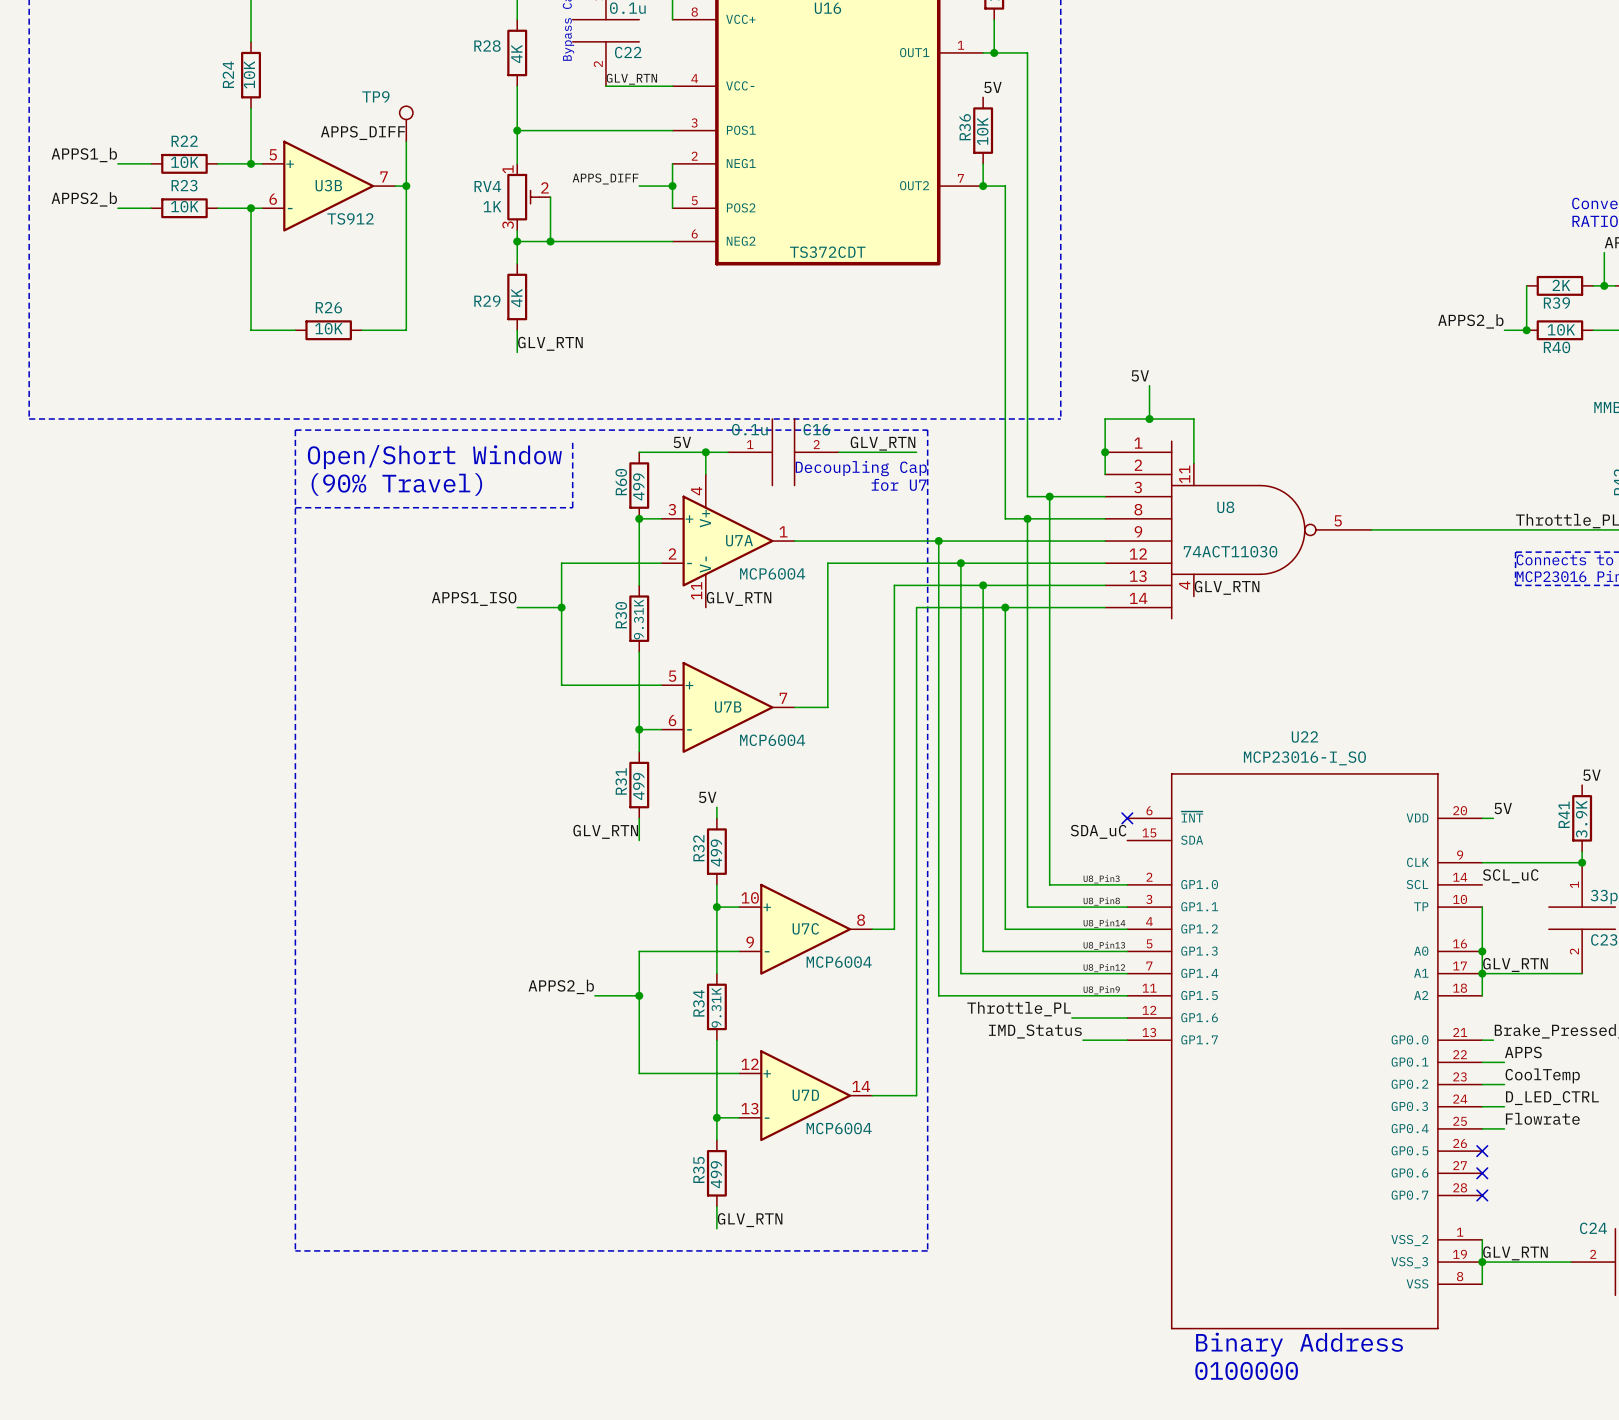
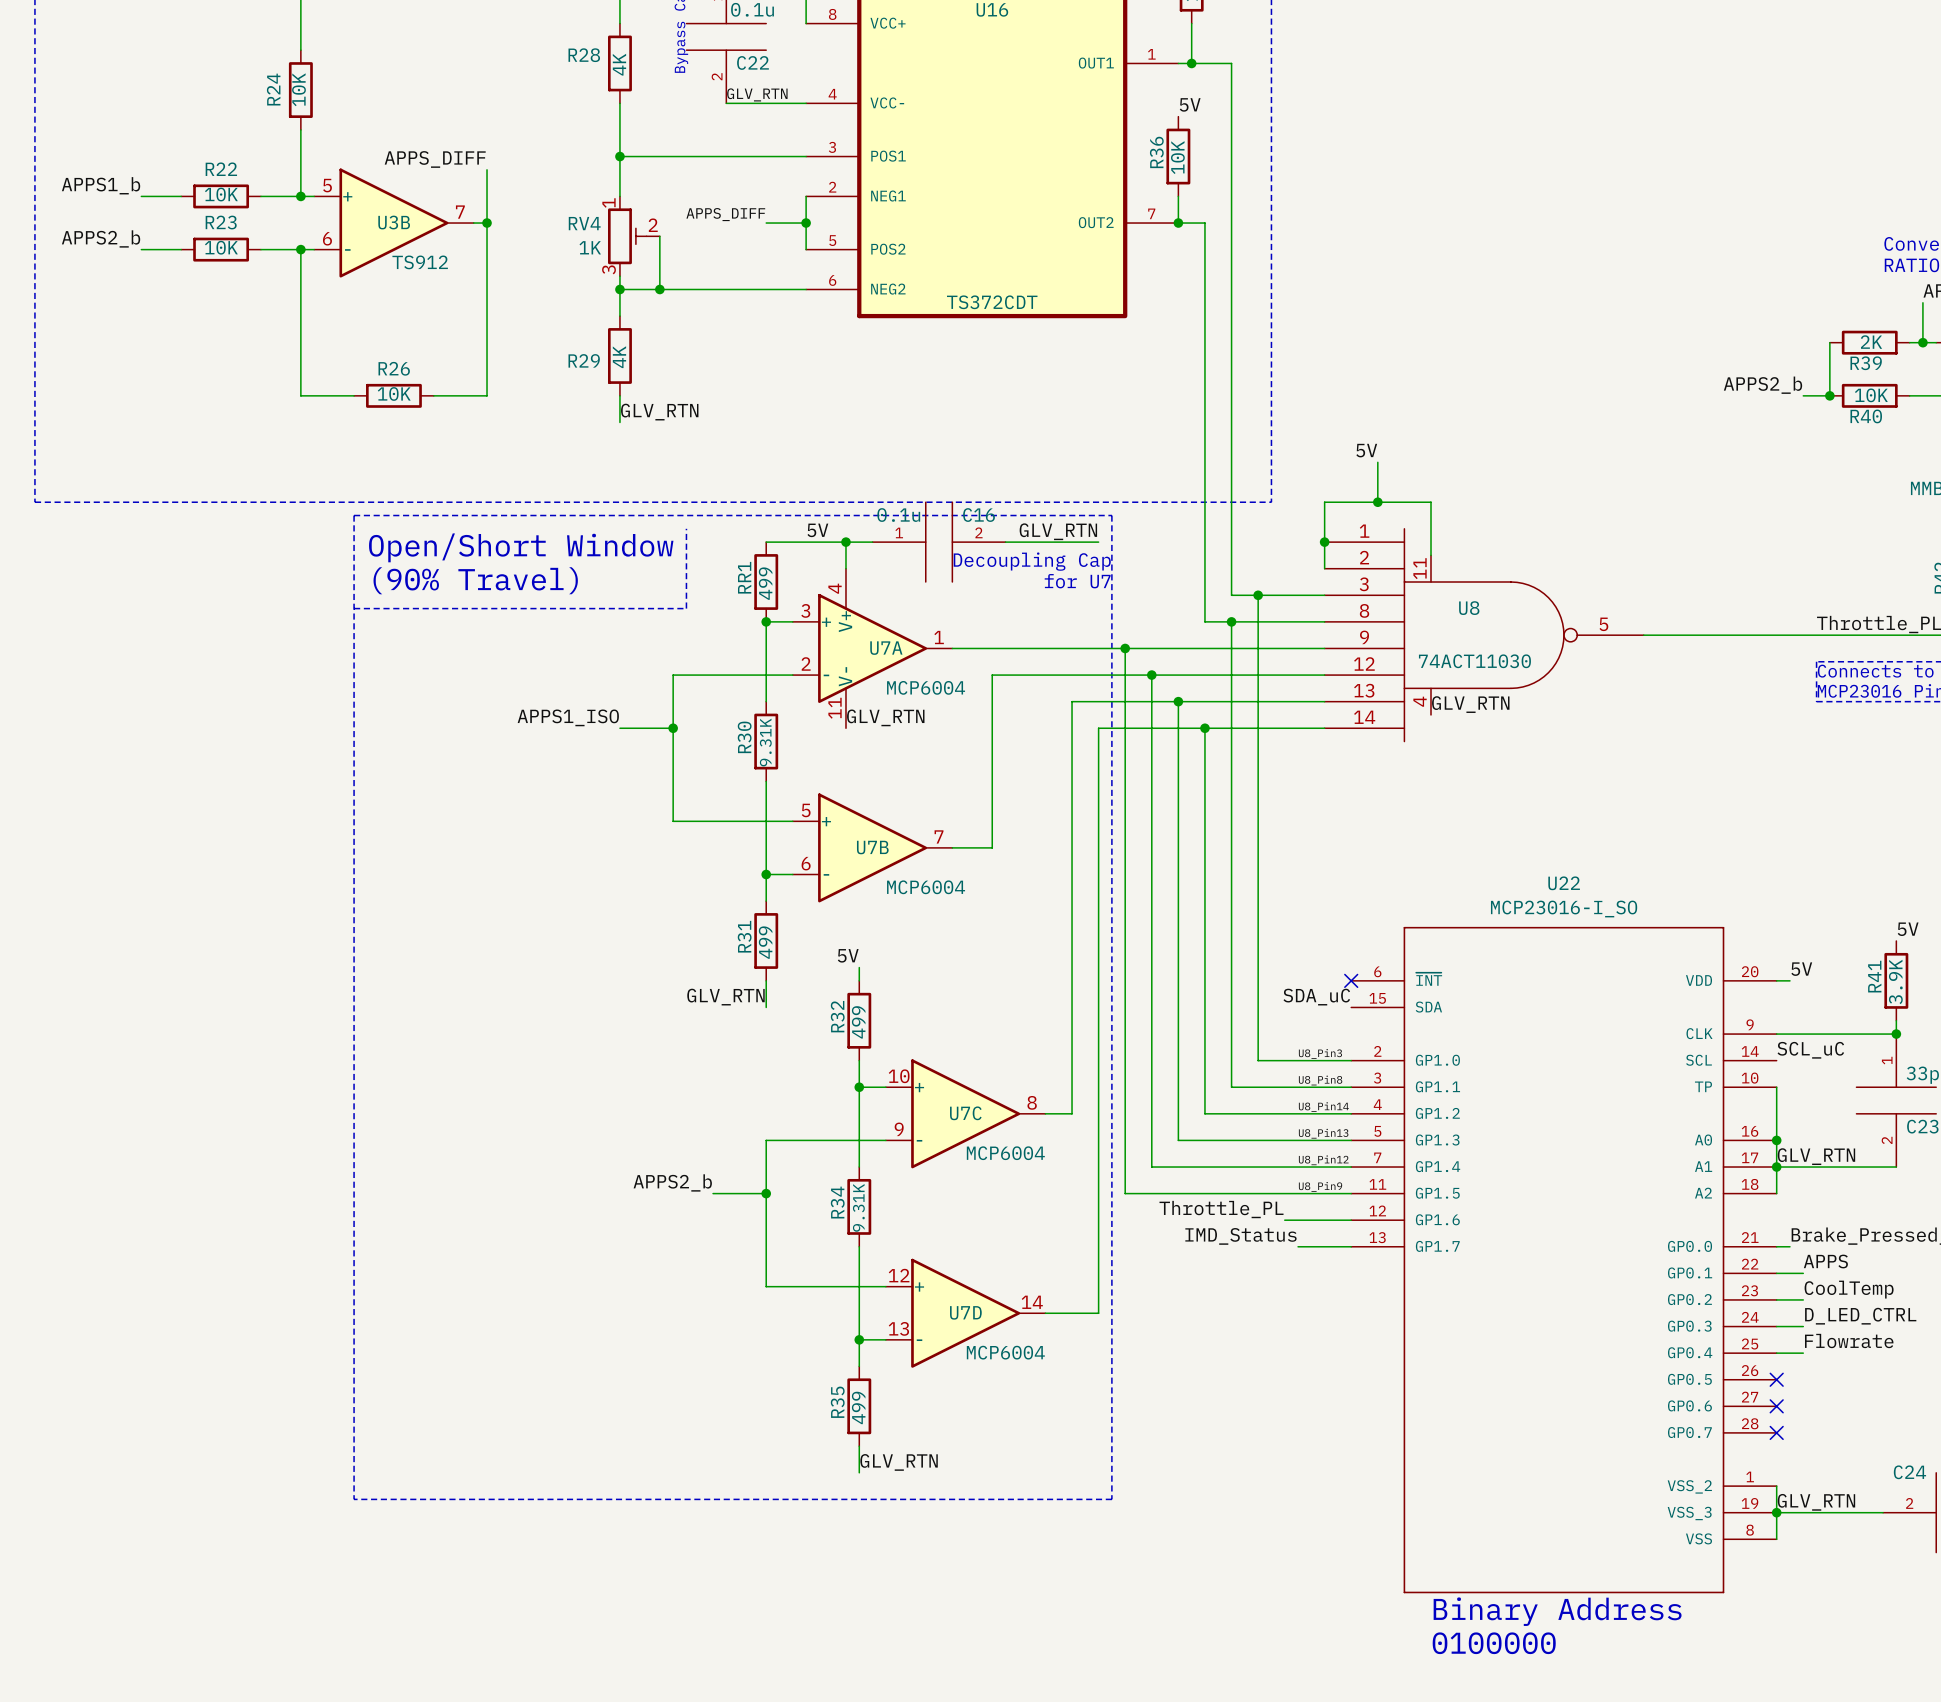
TP9: (406, 123) -> none
R60 name: R60 (621, 482) -> RR1 (744, 577)

